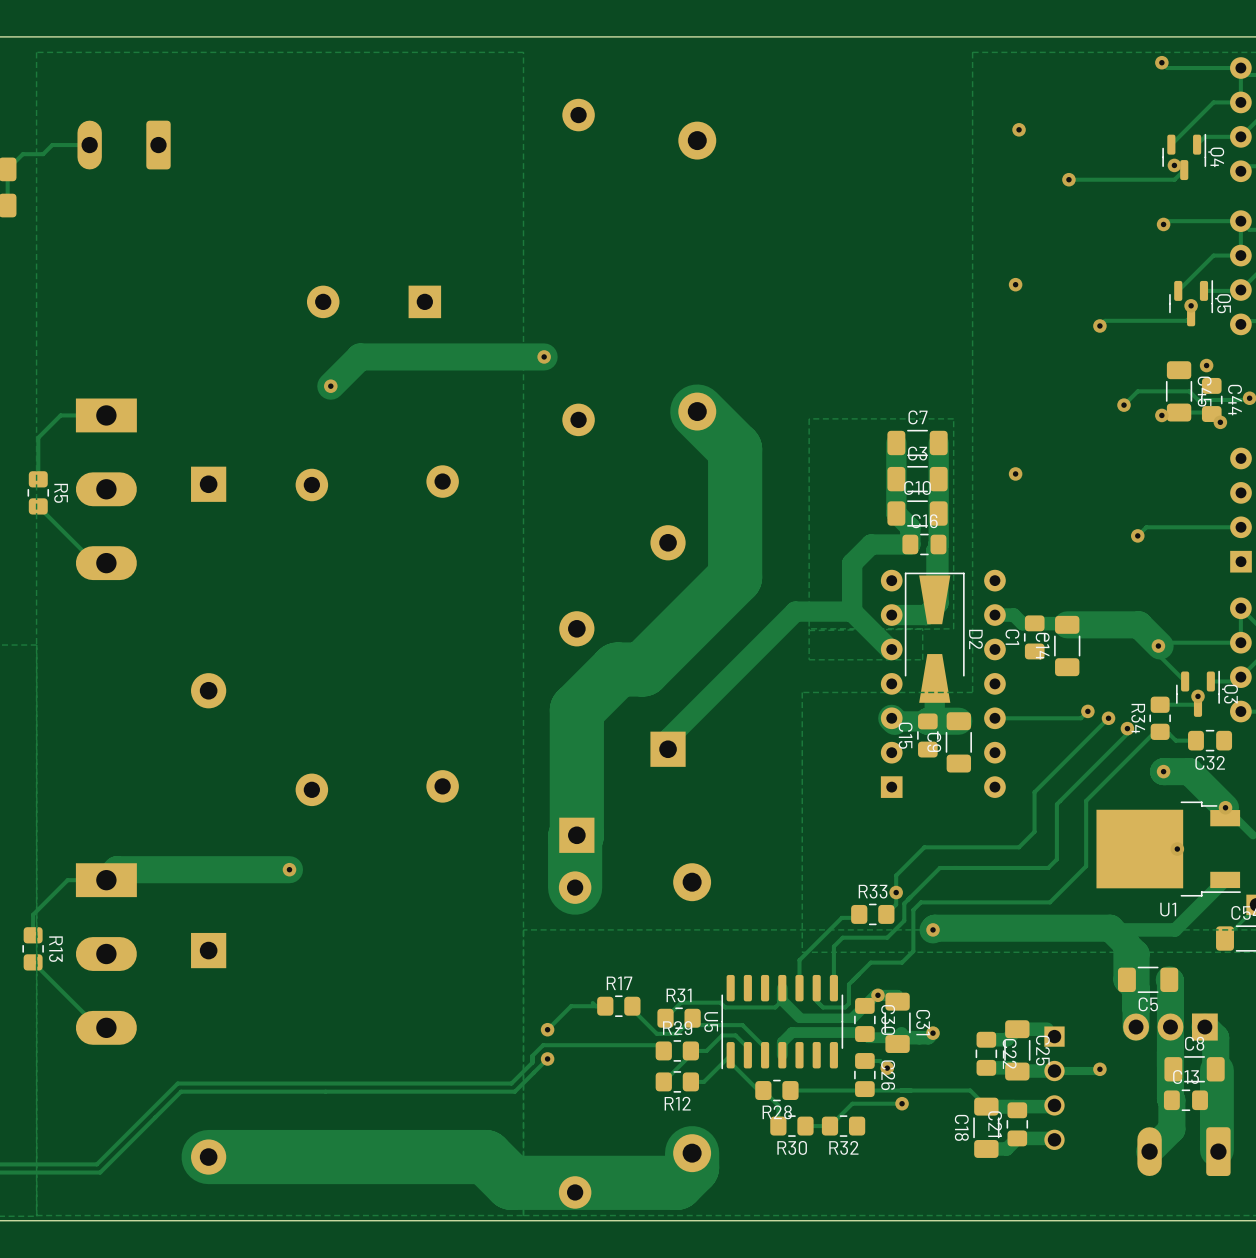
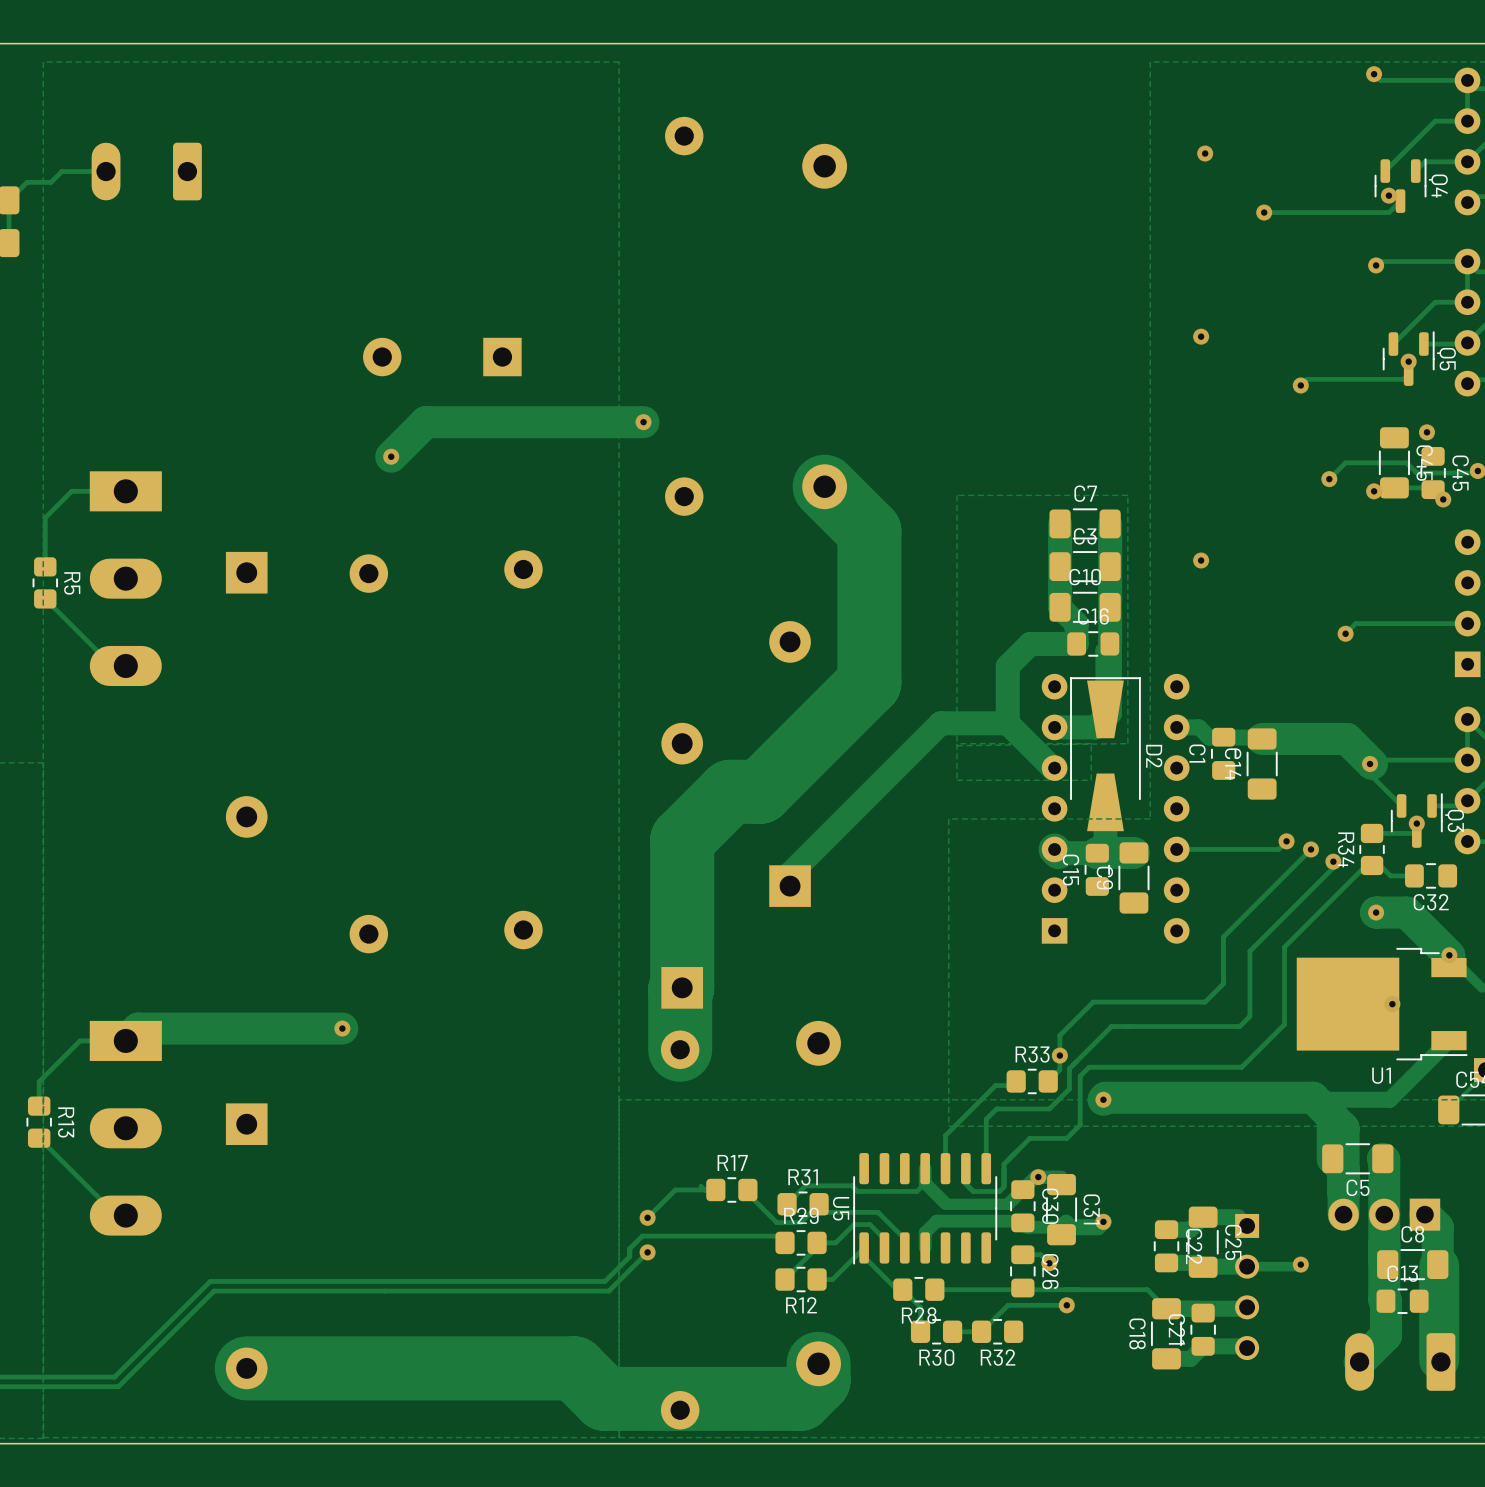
C44 name: C44 (1235, 400) -> C45 (1460, 473)

